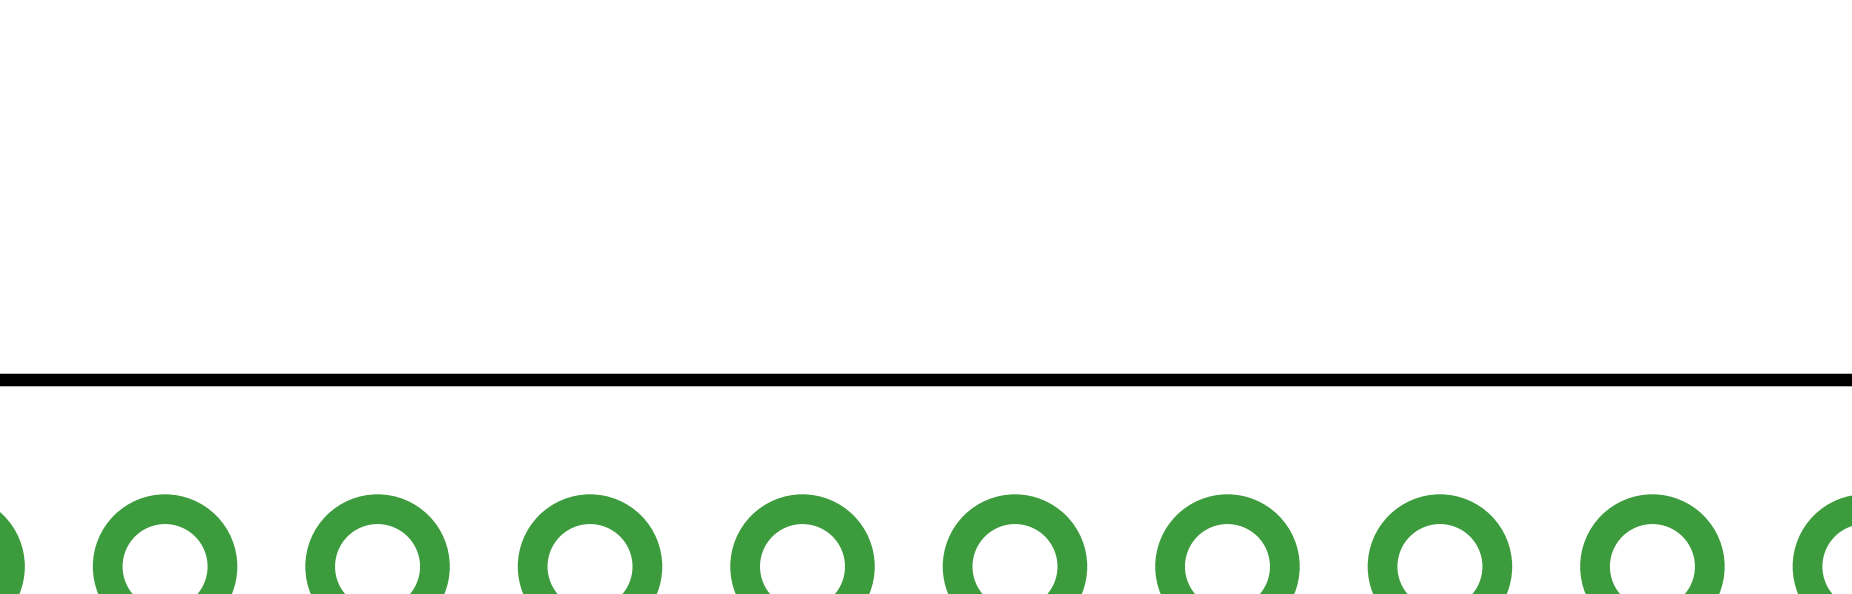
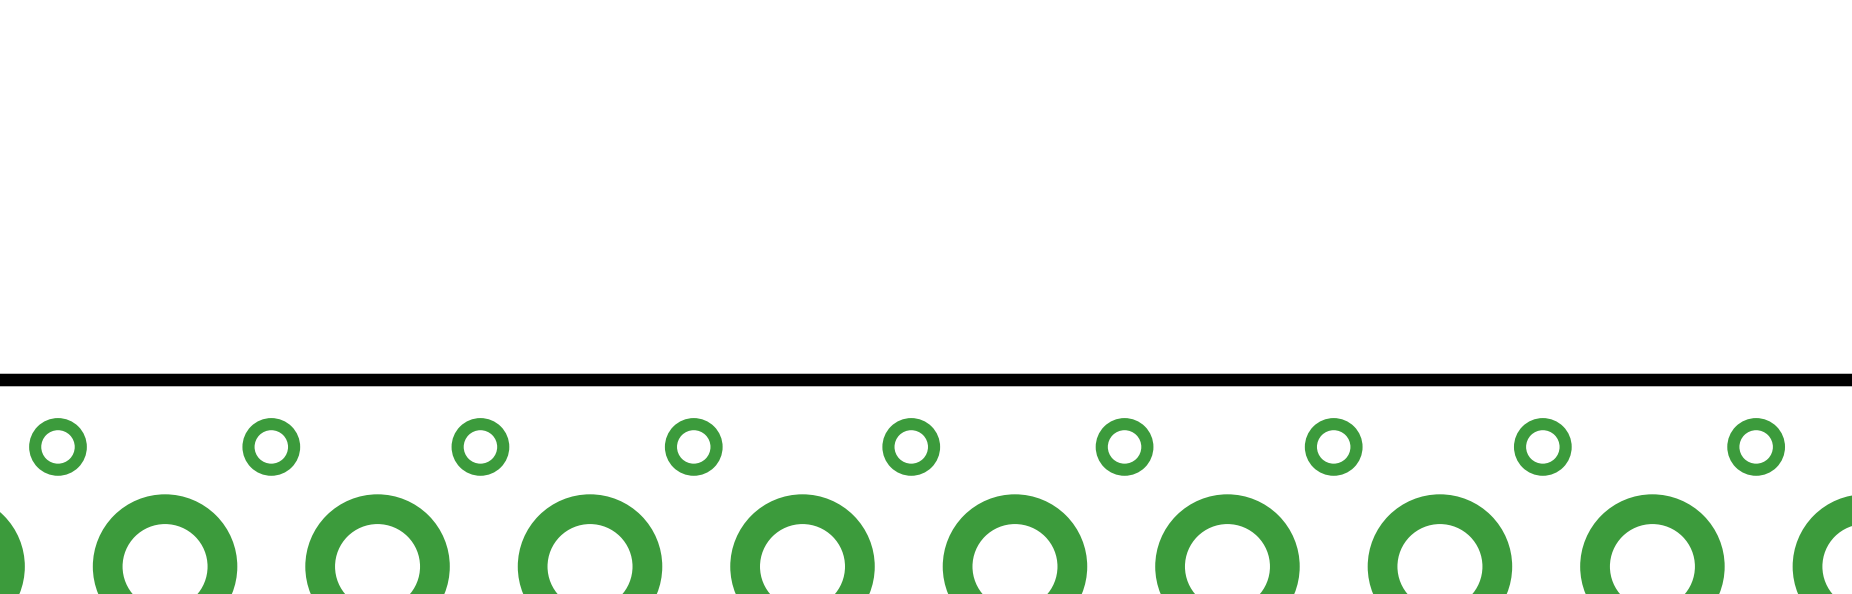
part: none -> (57, 446)
part: none -> (271, 446)
part: none -> (480, 446)
part: none -> (693, 446)
part: none -> (911, 446)
part: none -> (1124, 446)
part: none -> (1333, 446)
part: none -> (1542, 446)
part: none -> (1756, 446)

